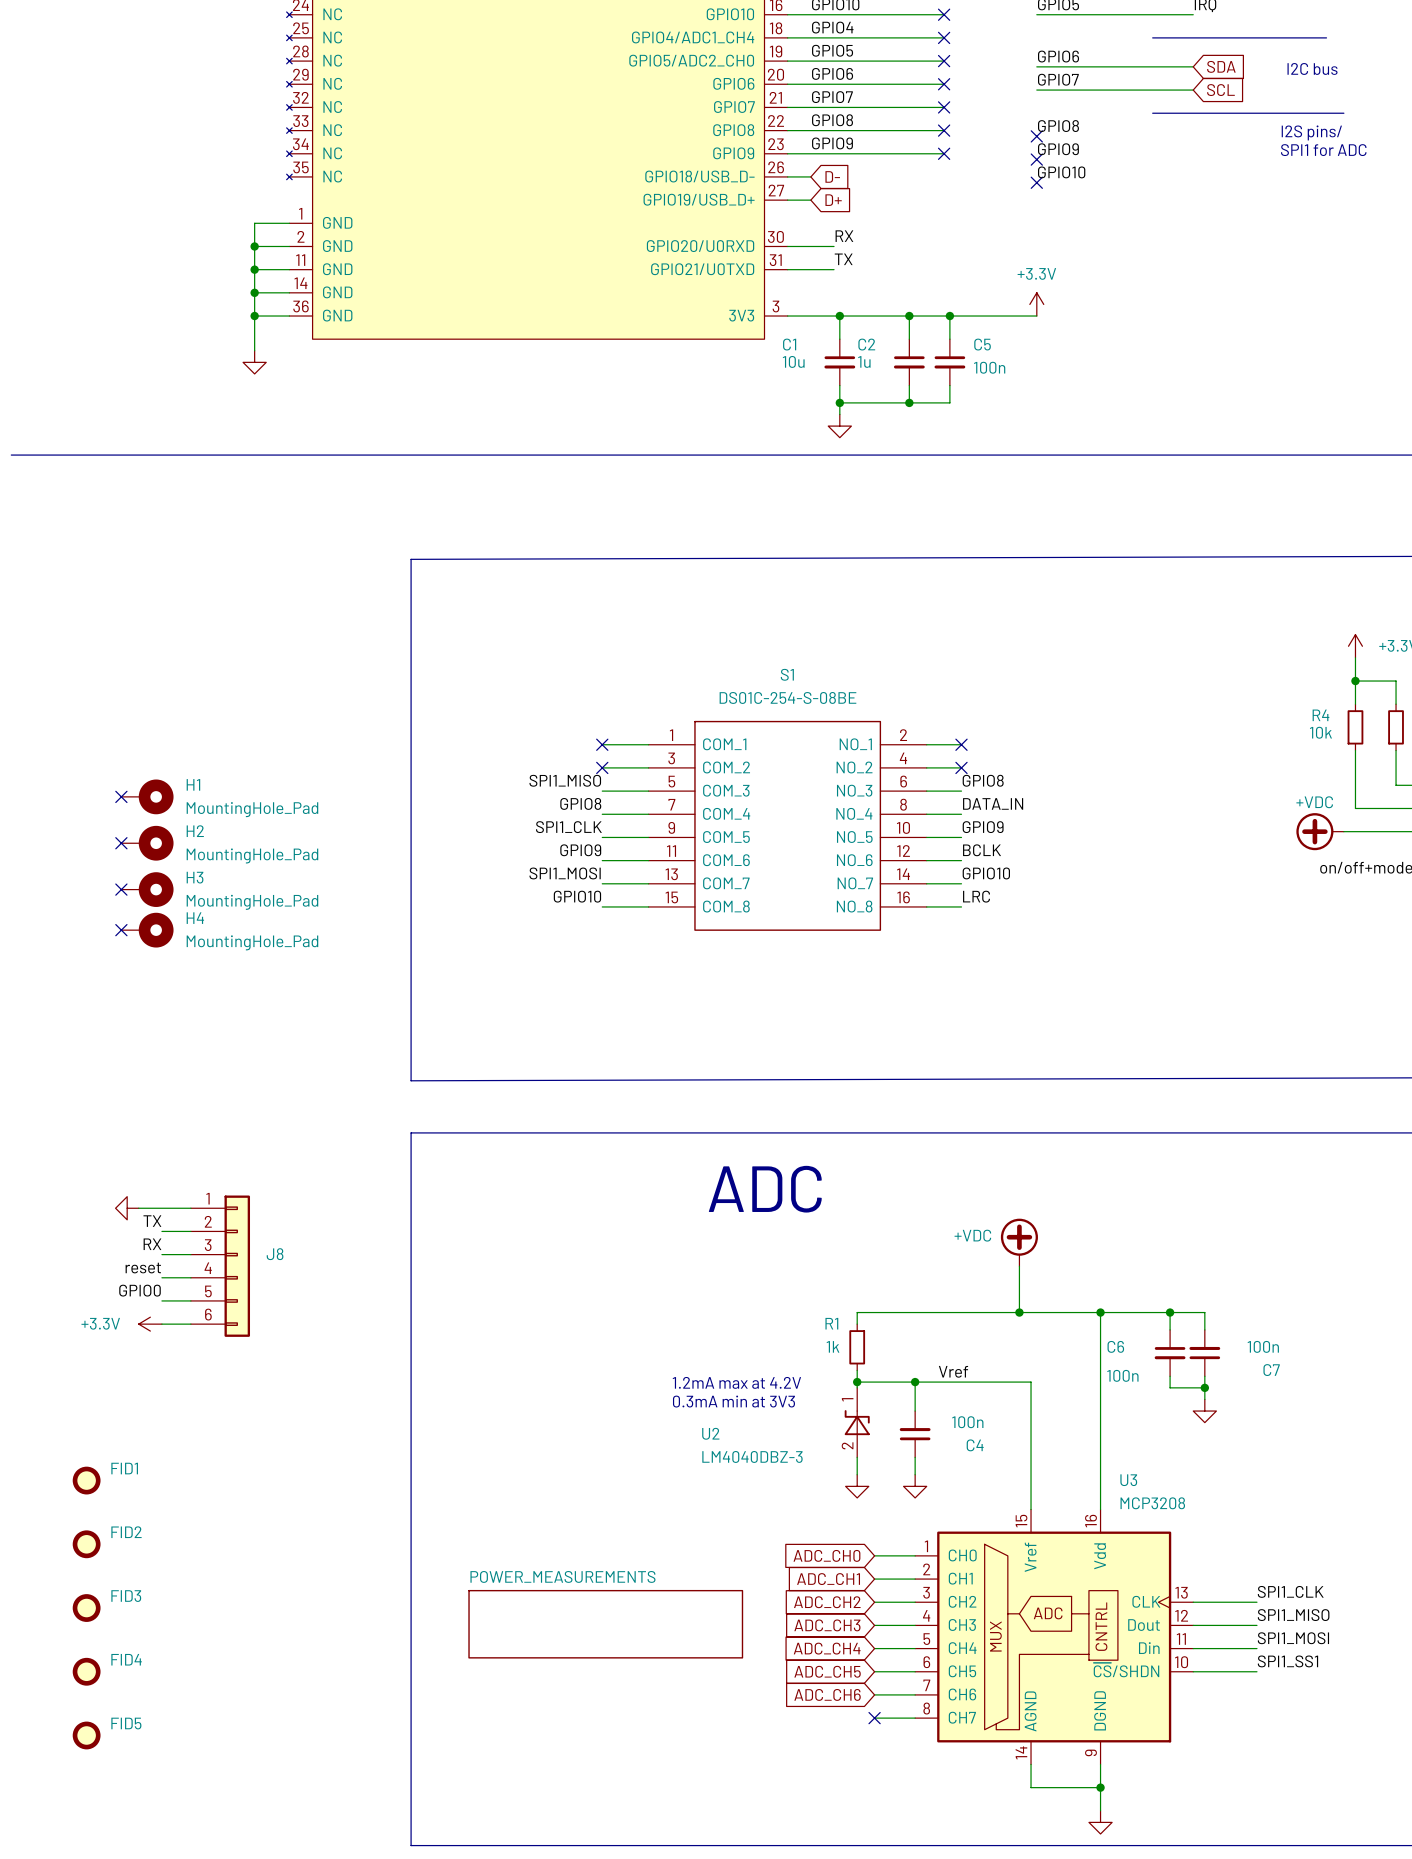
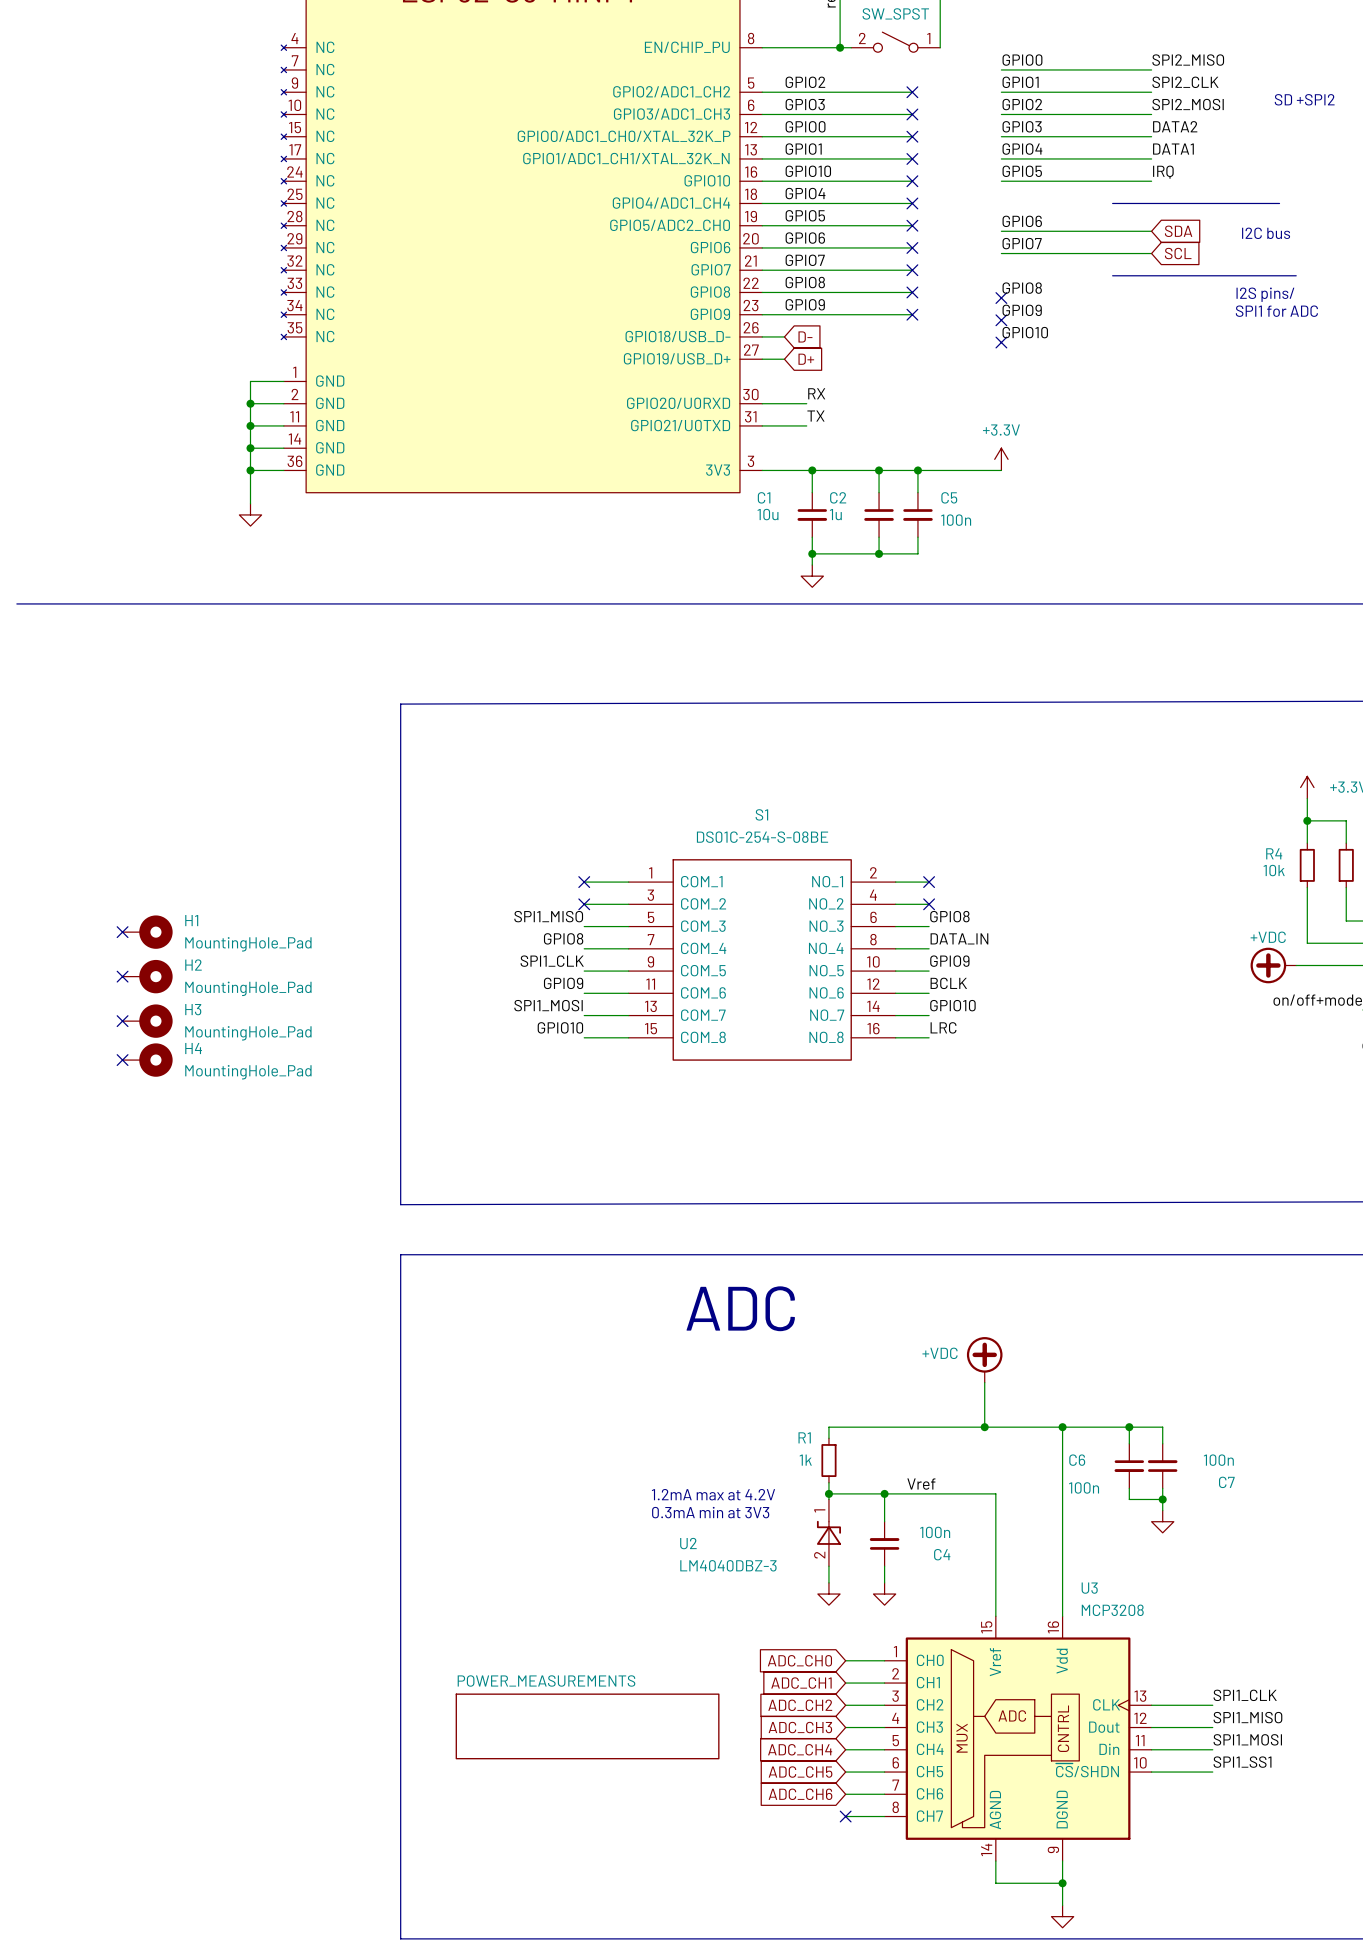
power symbol: (127, 1208) -> none
wire: (138, 1208) (190, 1208) -> none
label: TX (152, 1221) -> none
wire: (161, 1231) (190, 1231) -> none
label: RX (152, 1244) -> none
wire: (161, 1254) (190, 1254) -> none
J8: (220, 1266) -> none
label: reset (143, 1268) -> none
wire: (161, 1277) (190, 1277) -> none
label: GPIO0 (140, 1290) -> none
wire: (161, 1300) (190, 1300) -> none
power symbol: +3.3V (150, 1324) -> none
wire: (161, 1324) (190, 1324) -> none
FID1: (86, 1480) -> none
FID2: (86, 1544) -> none
FID3: (86, 1608) -> none
FID4: (86, 1671) -> none
FID5: (86, 1735) -> none

